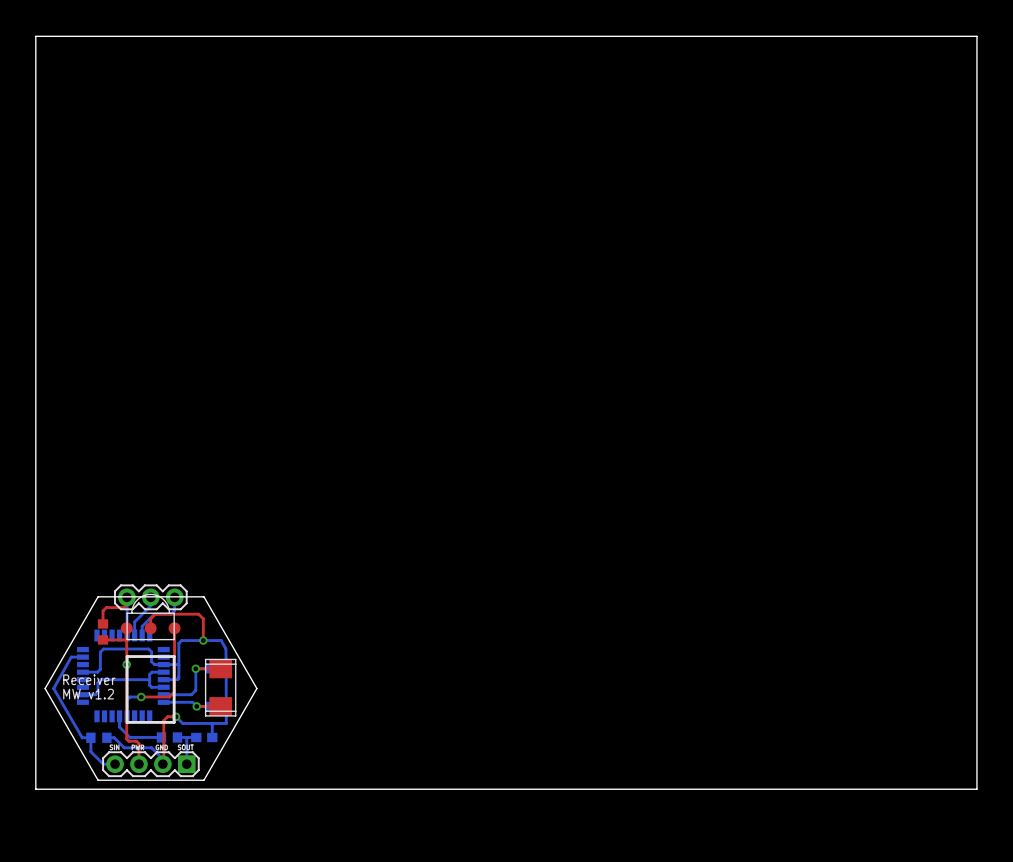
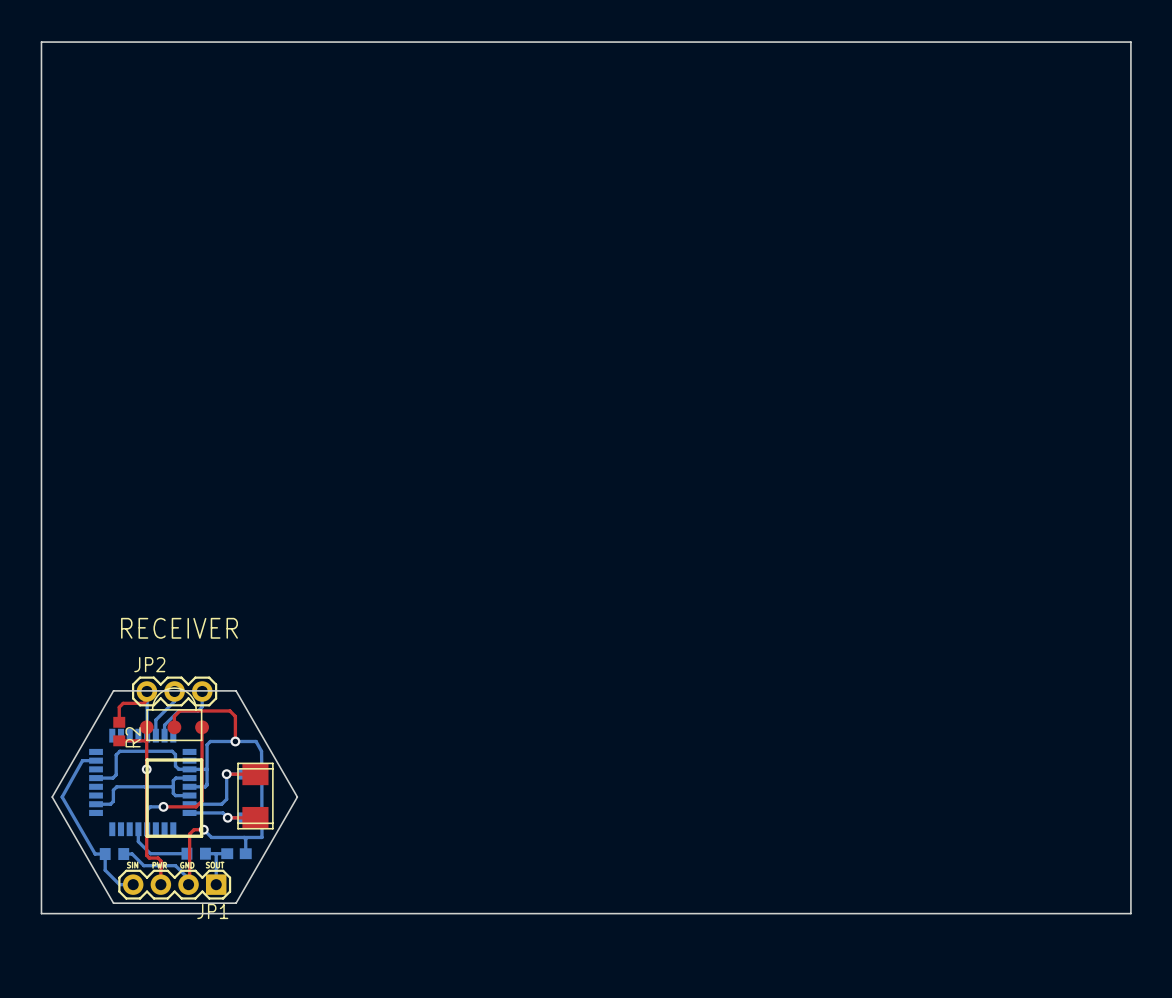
text: none -> RECEIVER (179, 628)
JP2 name: none -> JP2 (149, 664)
R2 name: none -> R2 (133, 737)
text: Receiver (89, 679) -> none
text: MW v1.2 (88, 694) -> none
JP1 name: none -> JP1 (212, 911)

